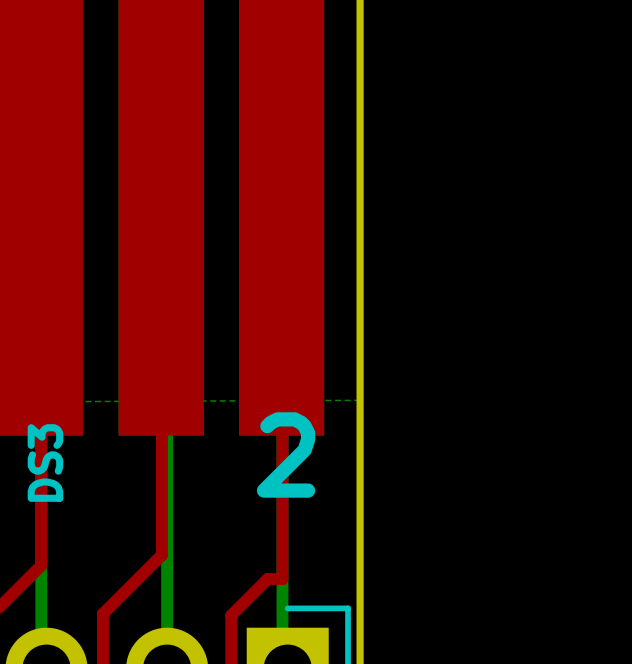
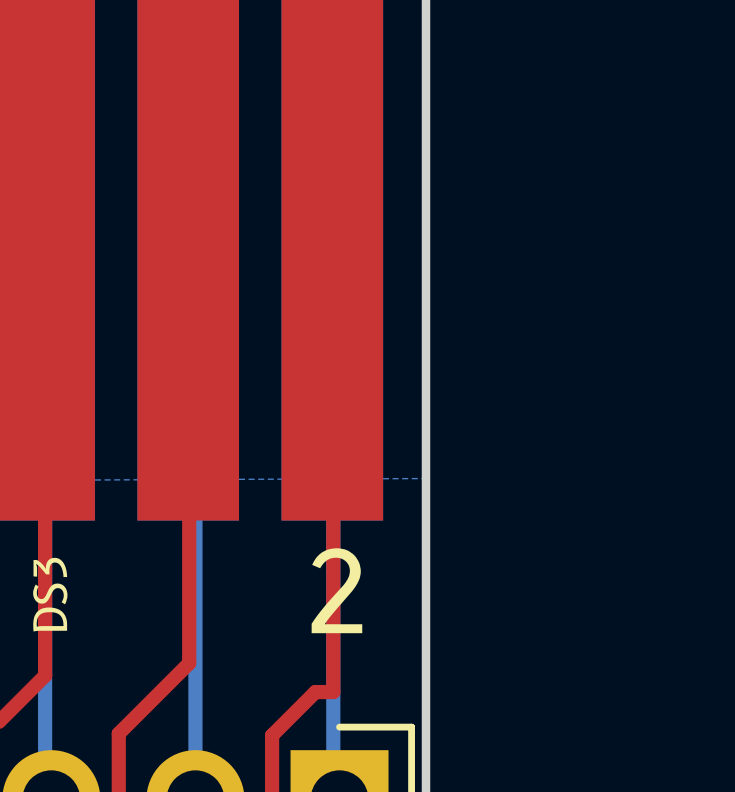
text position: 2 (286, 454) -> 2 (336, 590)
text position: DS3 (45, 463) -> DS3 (50, 594)

